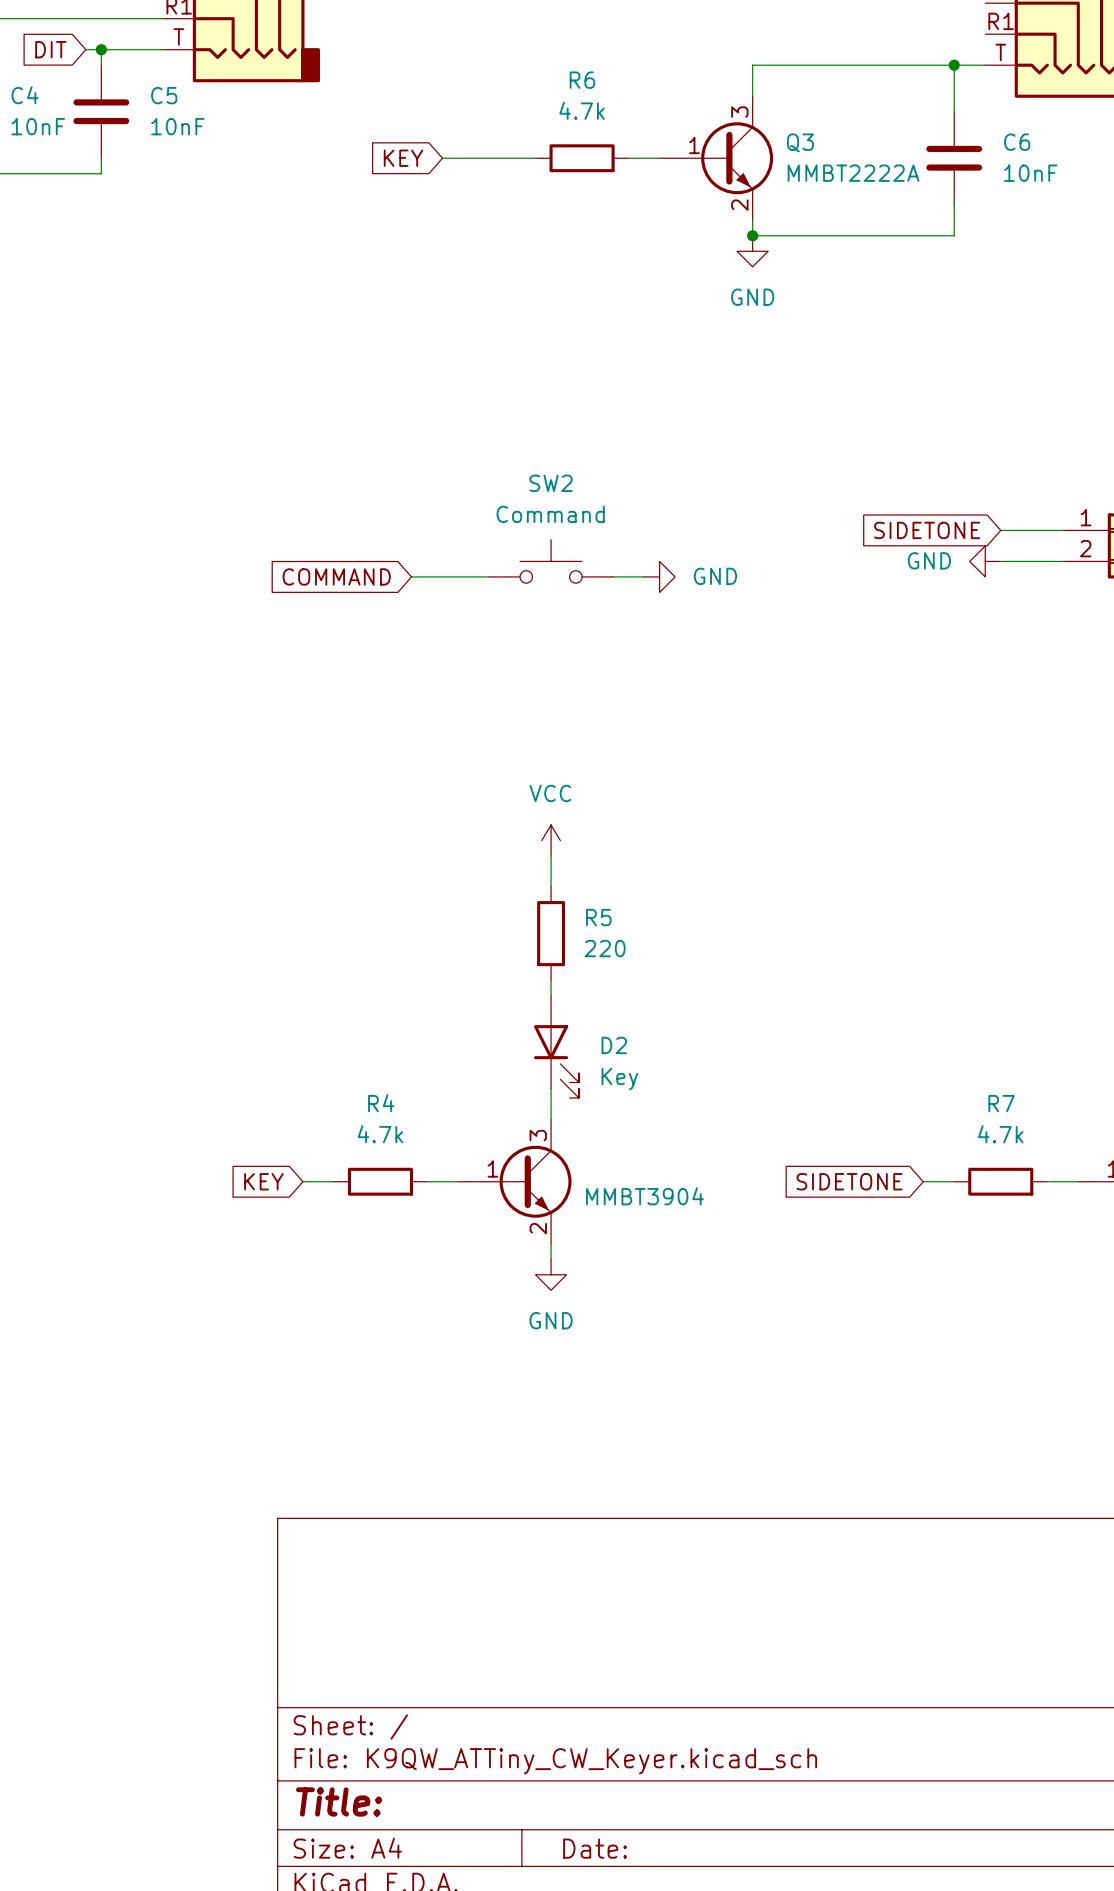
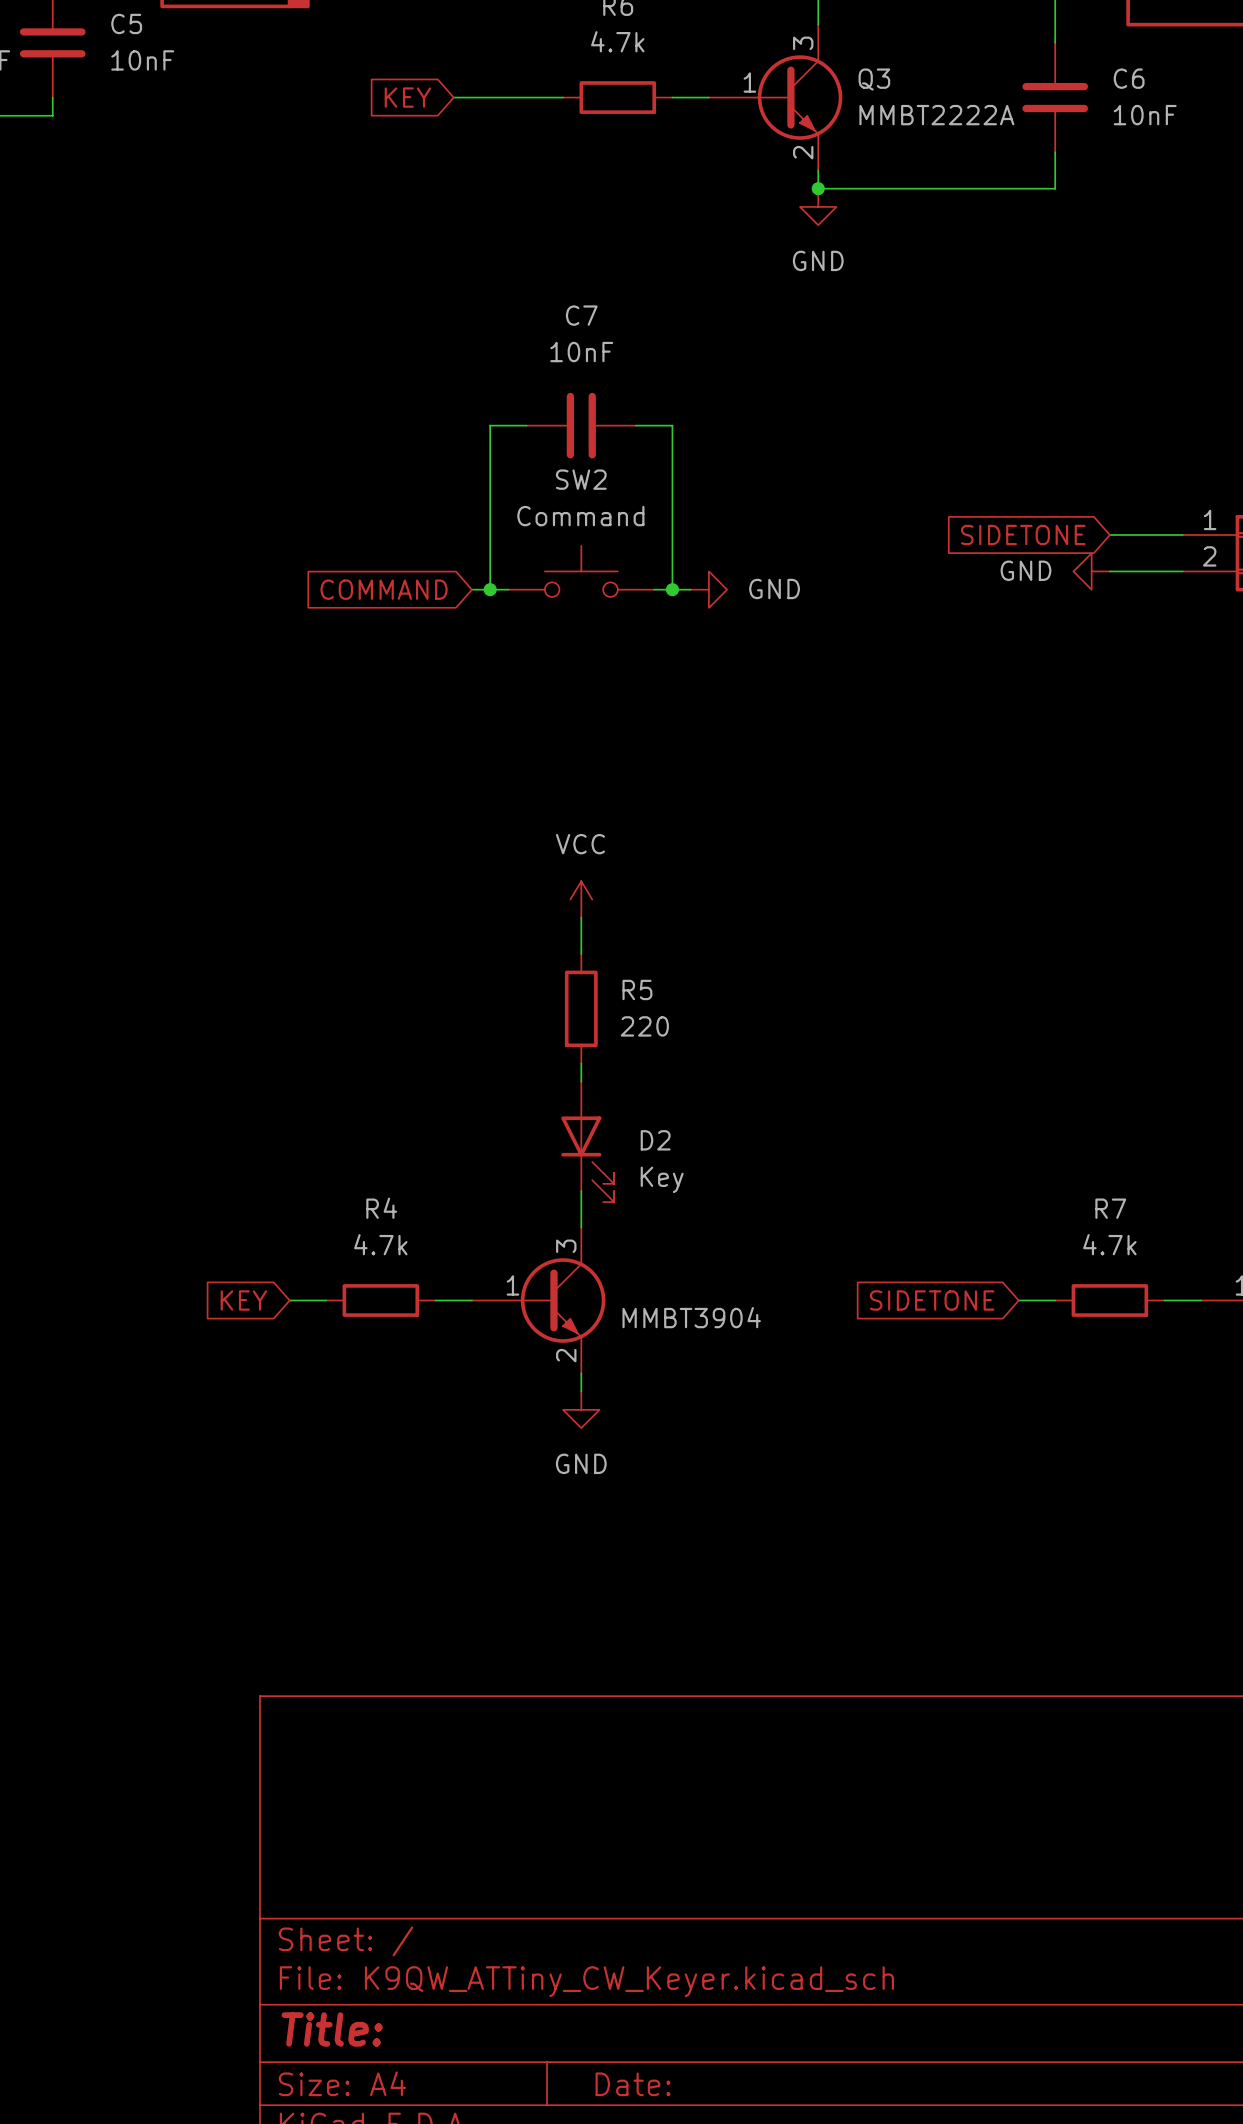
wire: none -> (526, 425) (490, 425) (490, 589)
C7: none -> 10nF (581, 425)
wire: none -> (635, 425) (672, 425) (672, 589)
global label position: COMMAND (336, 576) -> COMMAND (384, 589)
wire: (411, 576) (458, 576) -> none
junction: none -> (490, 589)
junction: none -> (672, 589)

